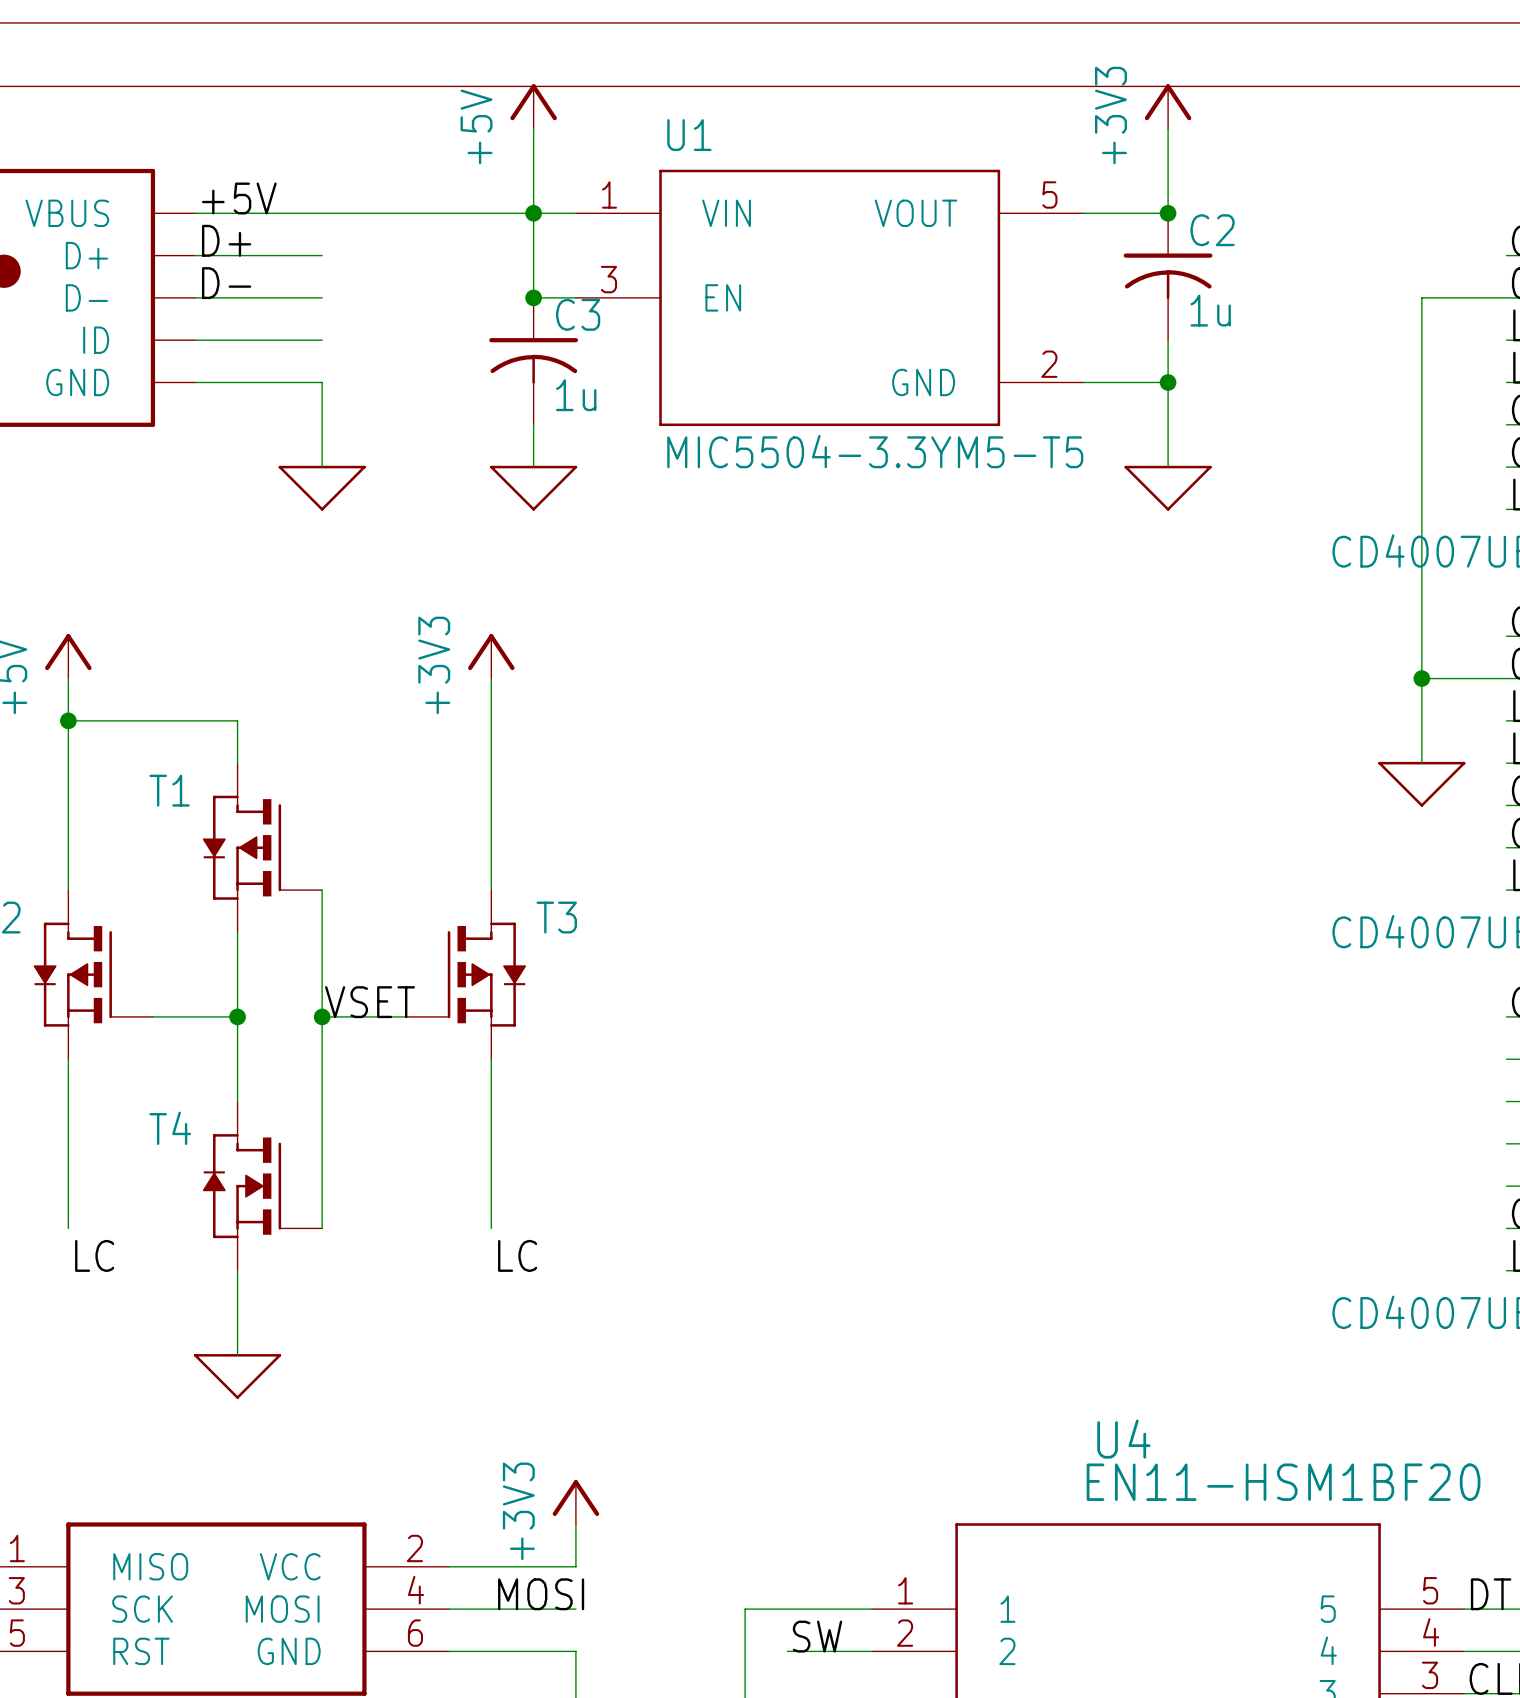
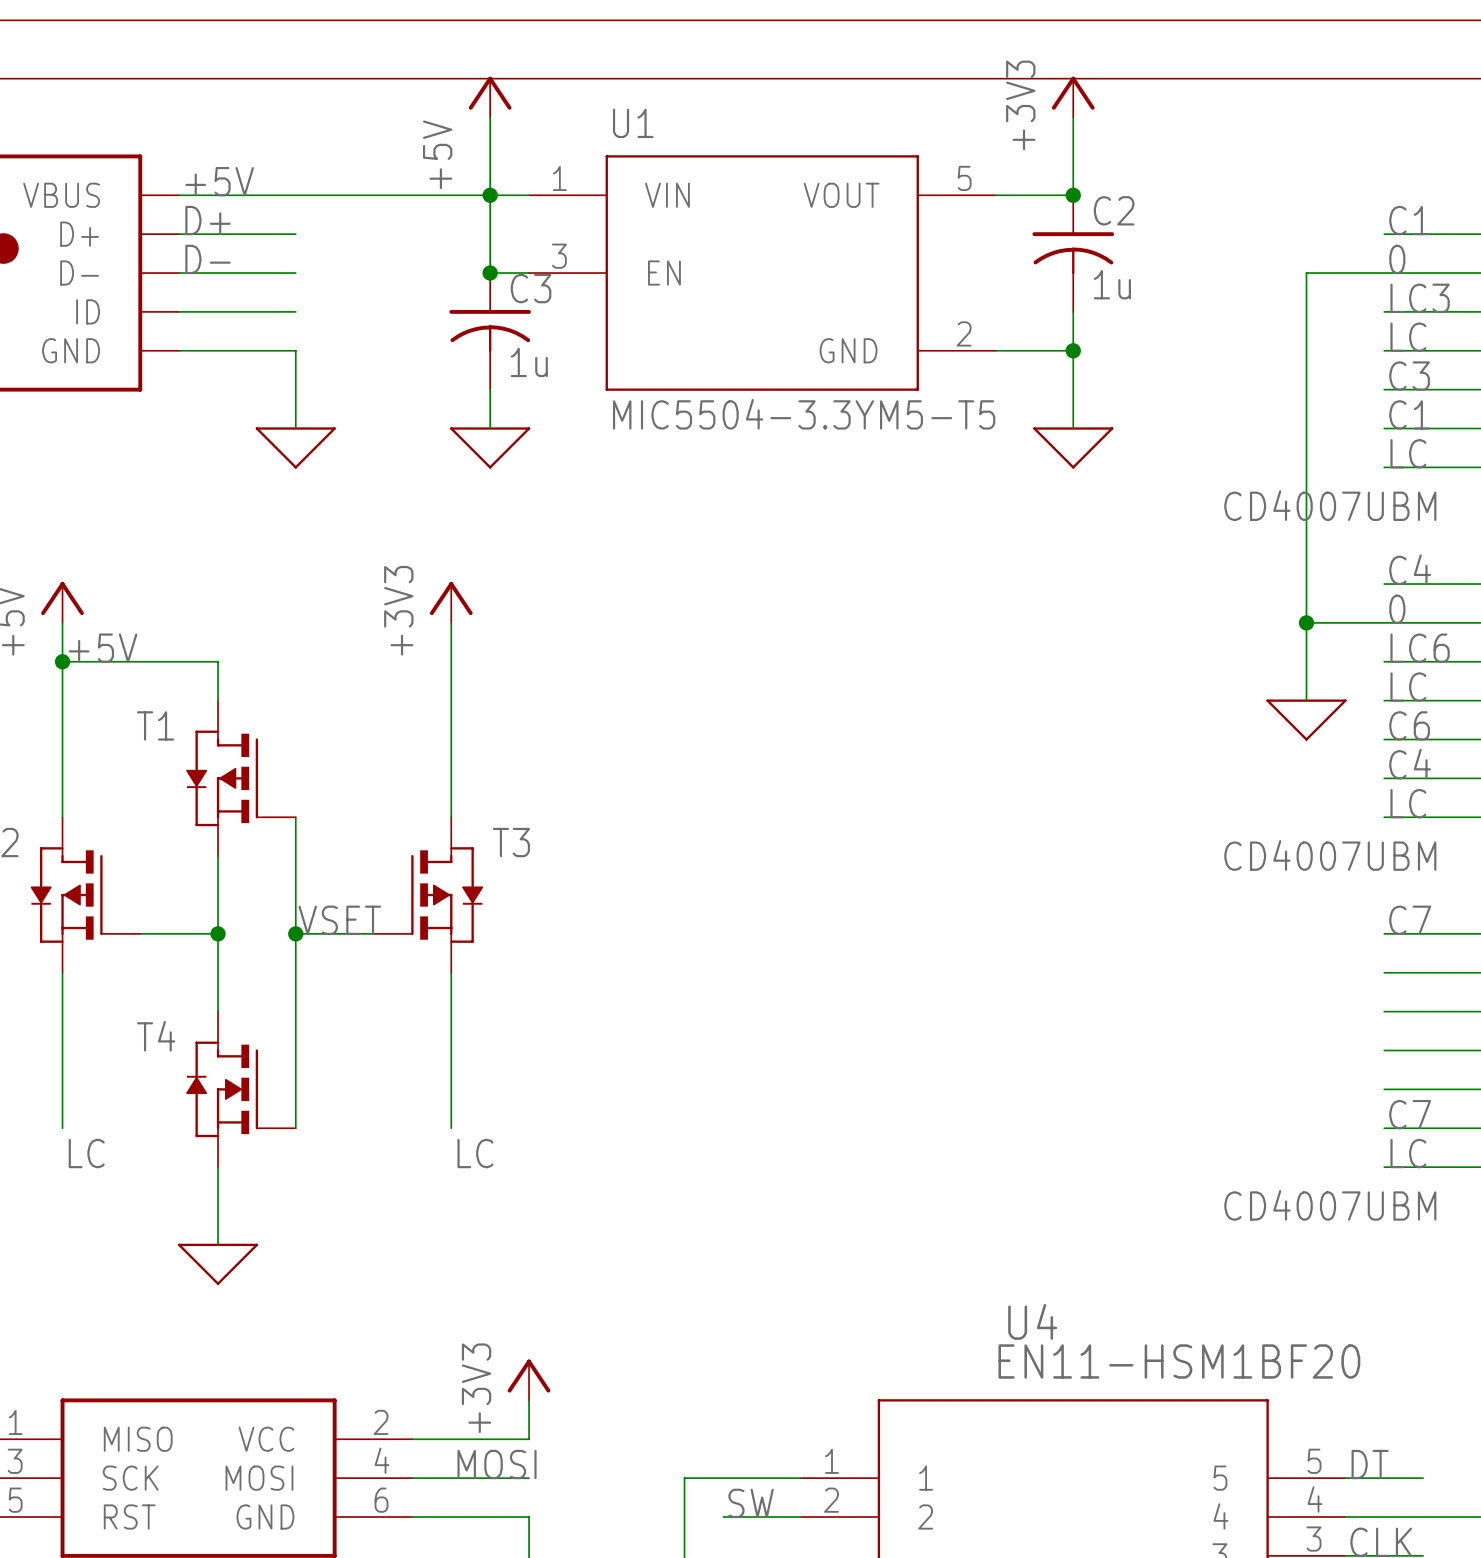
power symbol text position: +5V (476, 126) -> +5V (437, 154)
label: none -> +5V (103, 648)

